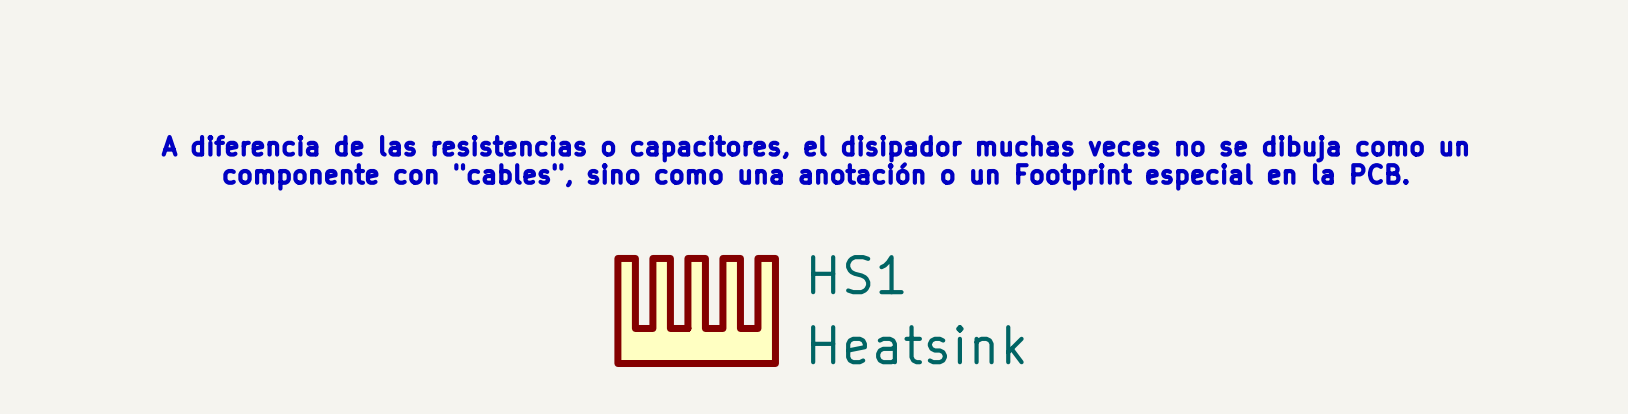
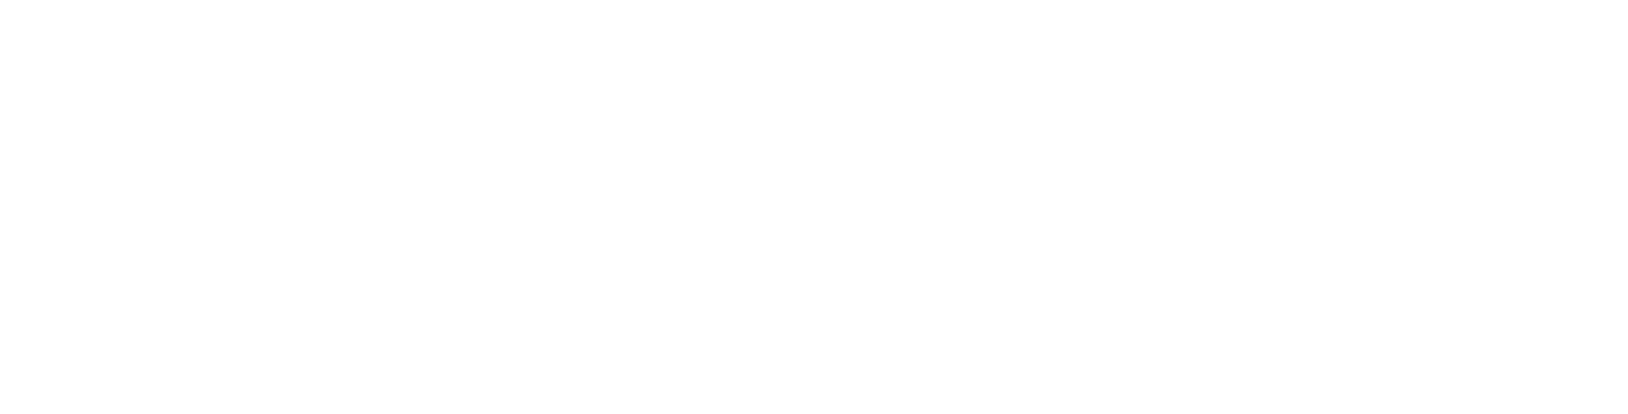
text: A diferencia de las resistencias o capacitores, el disipador muchas veces no se dibuja como un (814, 148) -> none
text: componente con "cables", sino como una anotación o un Footprint especial en la PCB. (816, 176) -> none
HS1: Heatsink (696, 310) -> none

